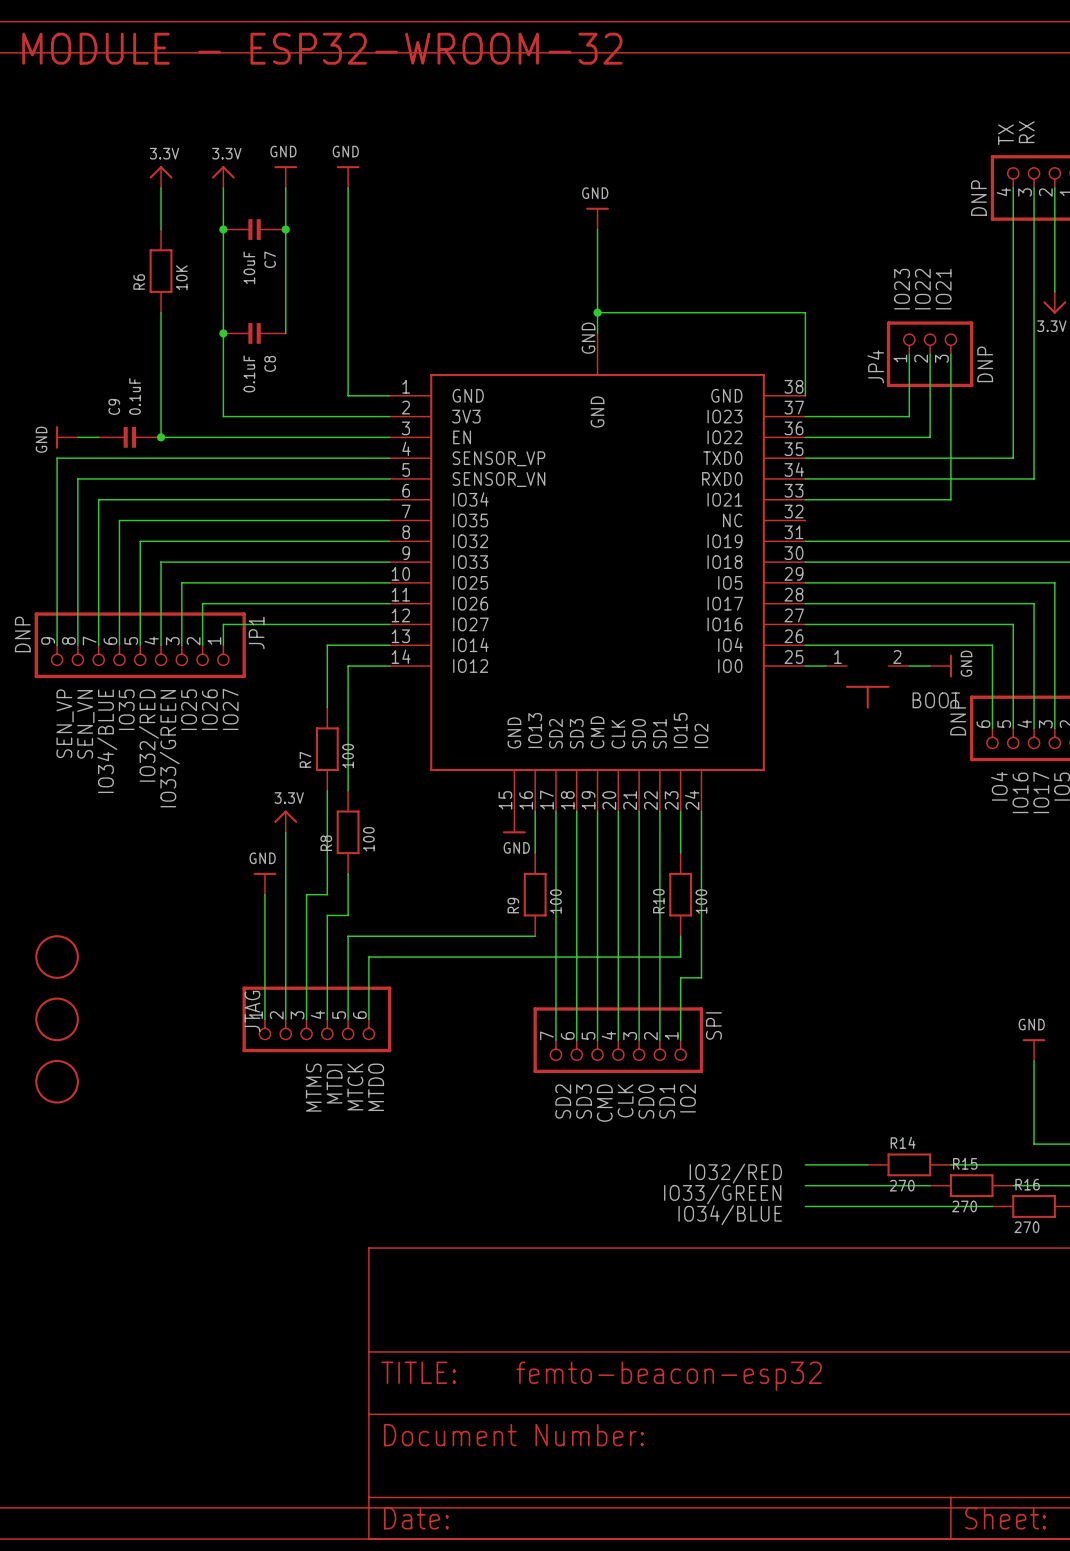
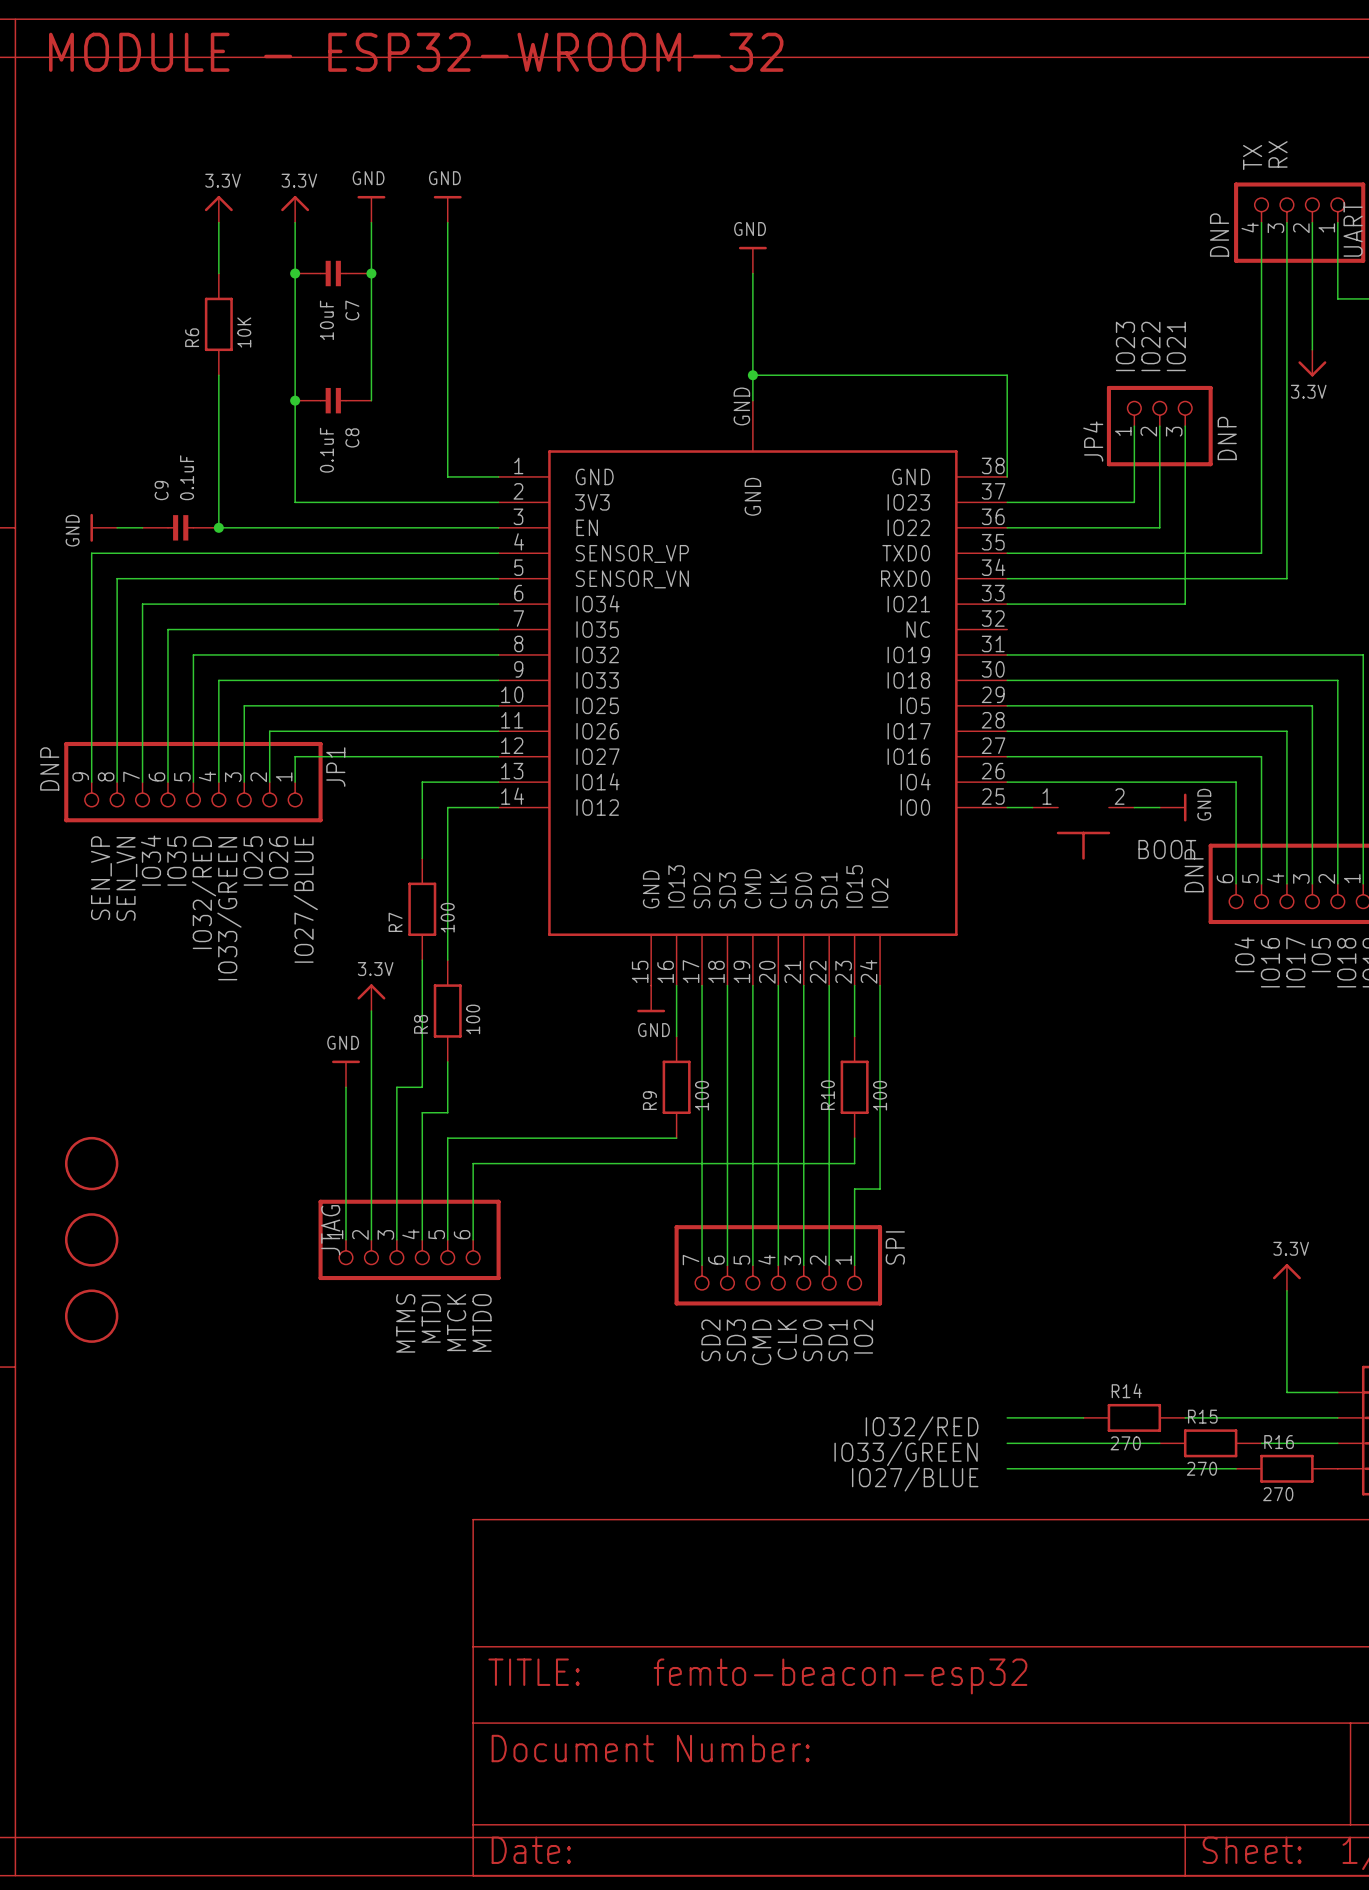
label: IO27 (230, 709) -> IO27/BLUE (305, 899)
label: IO34/BLUE (107, 741) -> IO34 (151, 860)
power symbol: GND (1034, 1050) -> 3.3V (1286, 1277)
label: IO34/BLUE (730, 1215) -> IO27/BLUE (915, 1479)

